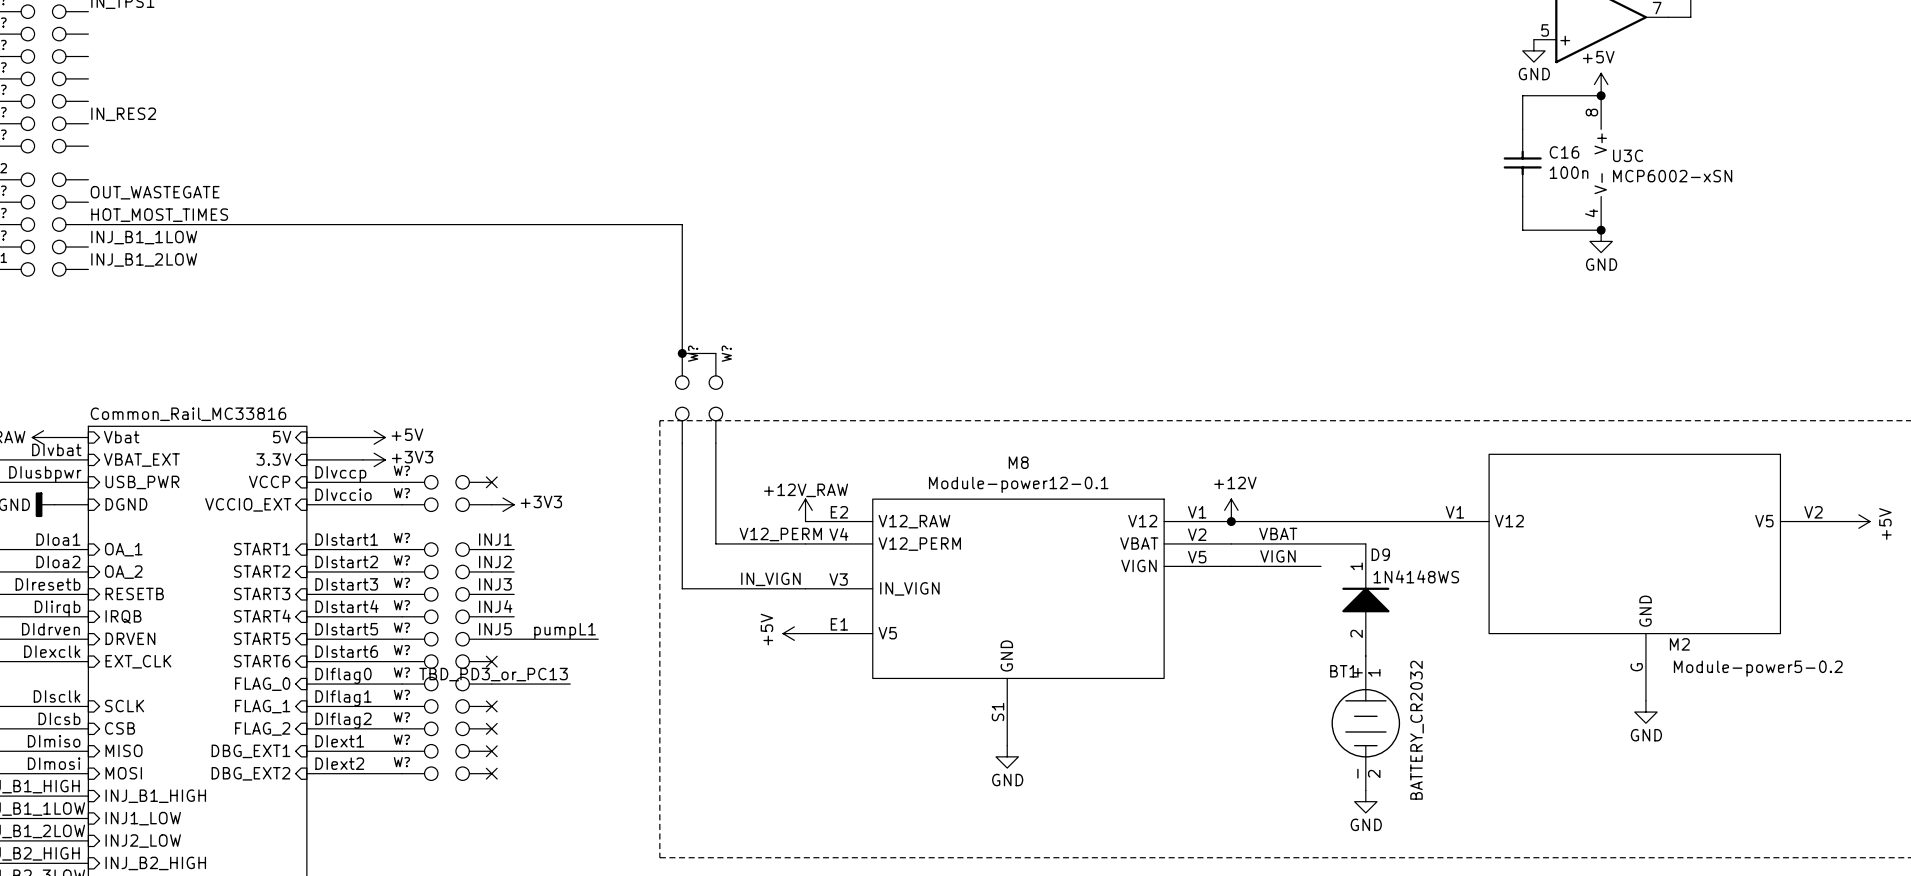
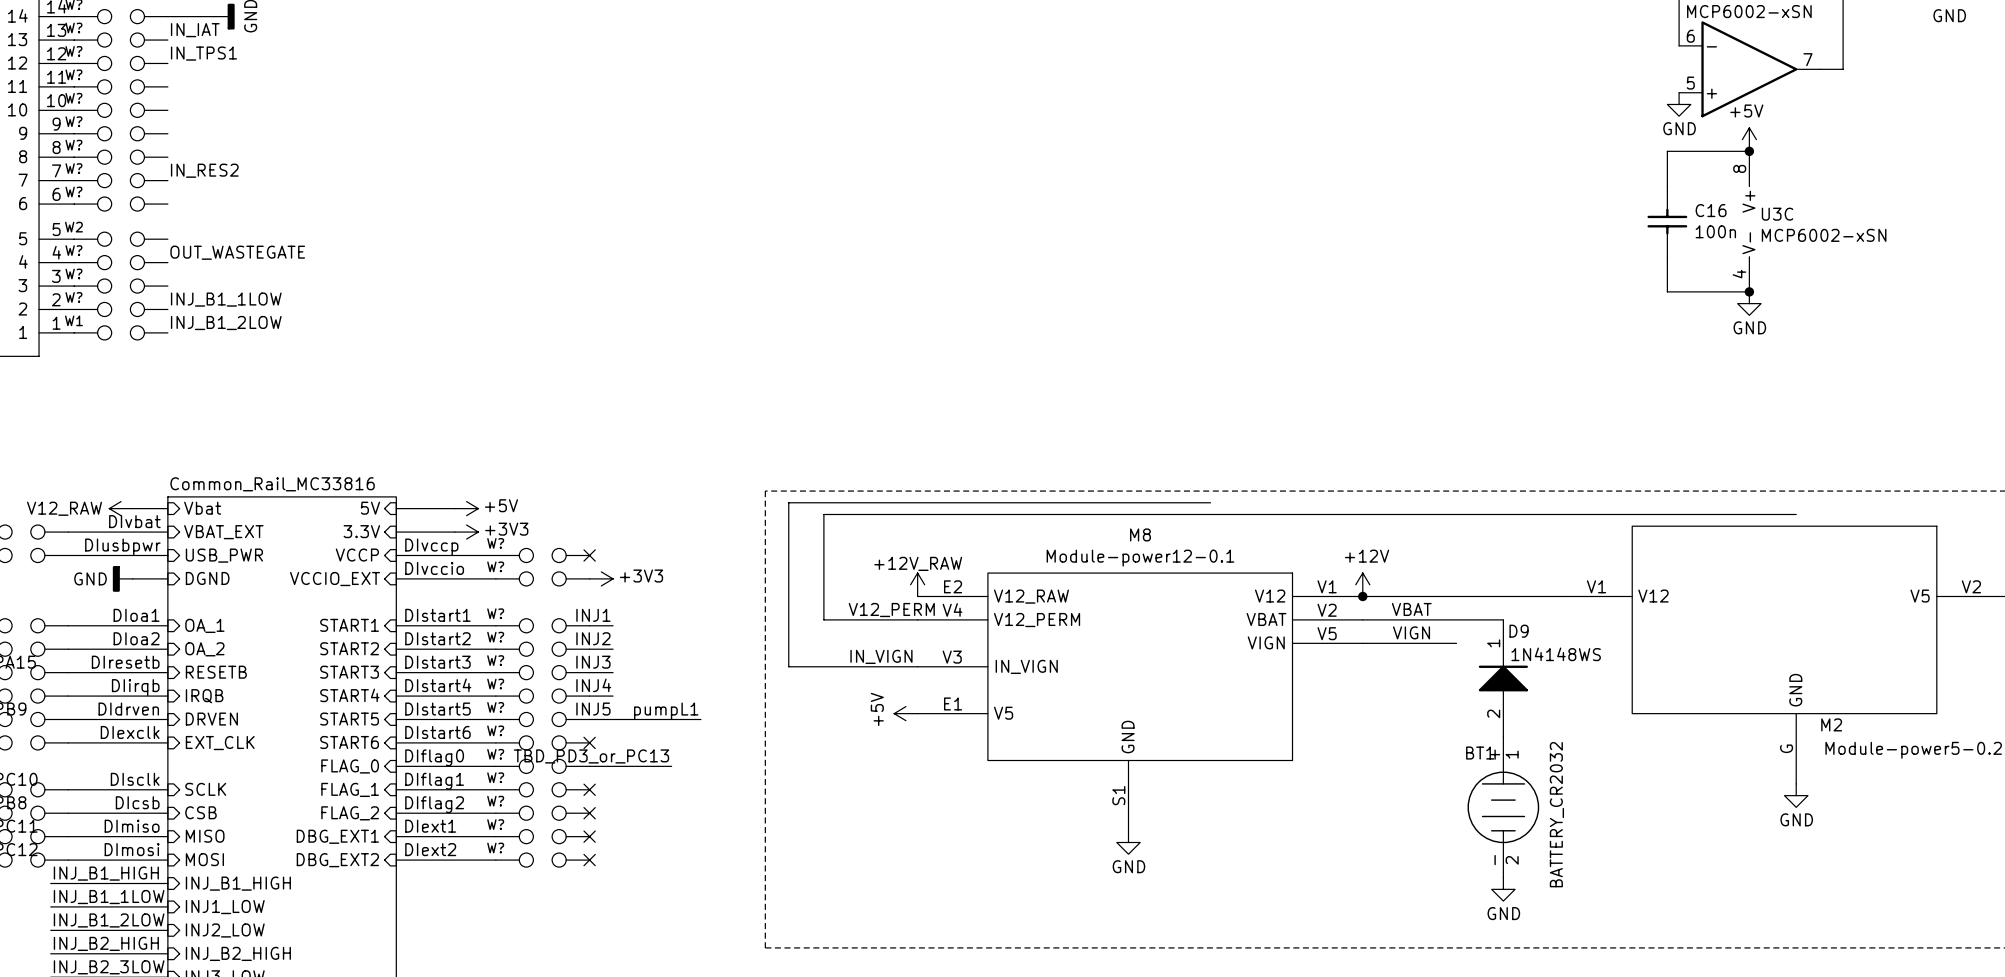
label: HOT_MOST_TIMES (159, 215) -> none
wire: (88, 224) (682, 224) (682, 353) (715, 353) -> none
junction: (682, 353) -> none
W?: (682, 398) -> none
W?: (715, 398) -> none
wire: none -> (1210, 502) (788, 502) (788, 514)
wire: none -> (823, 514) (1796, 514)

